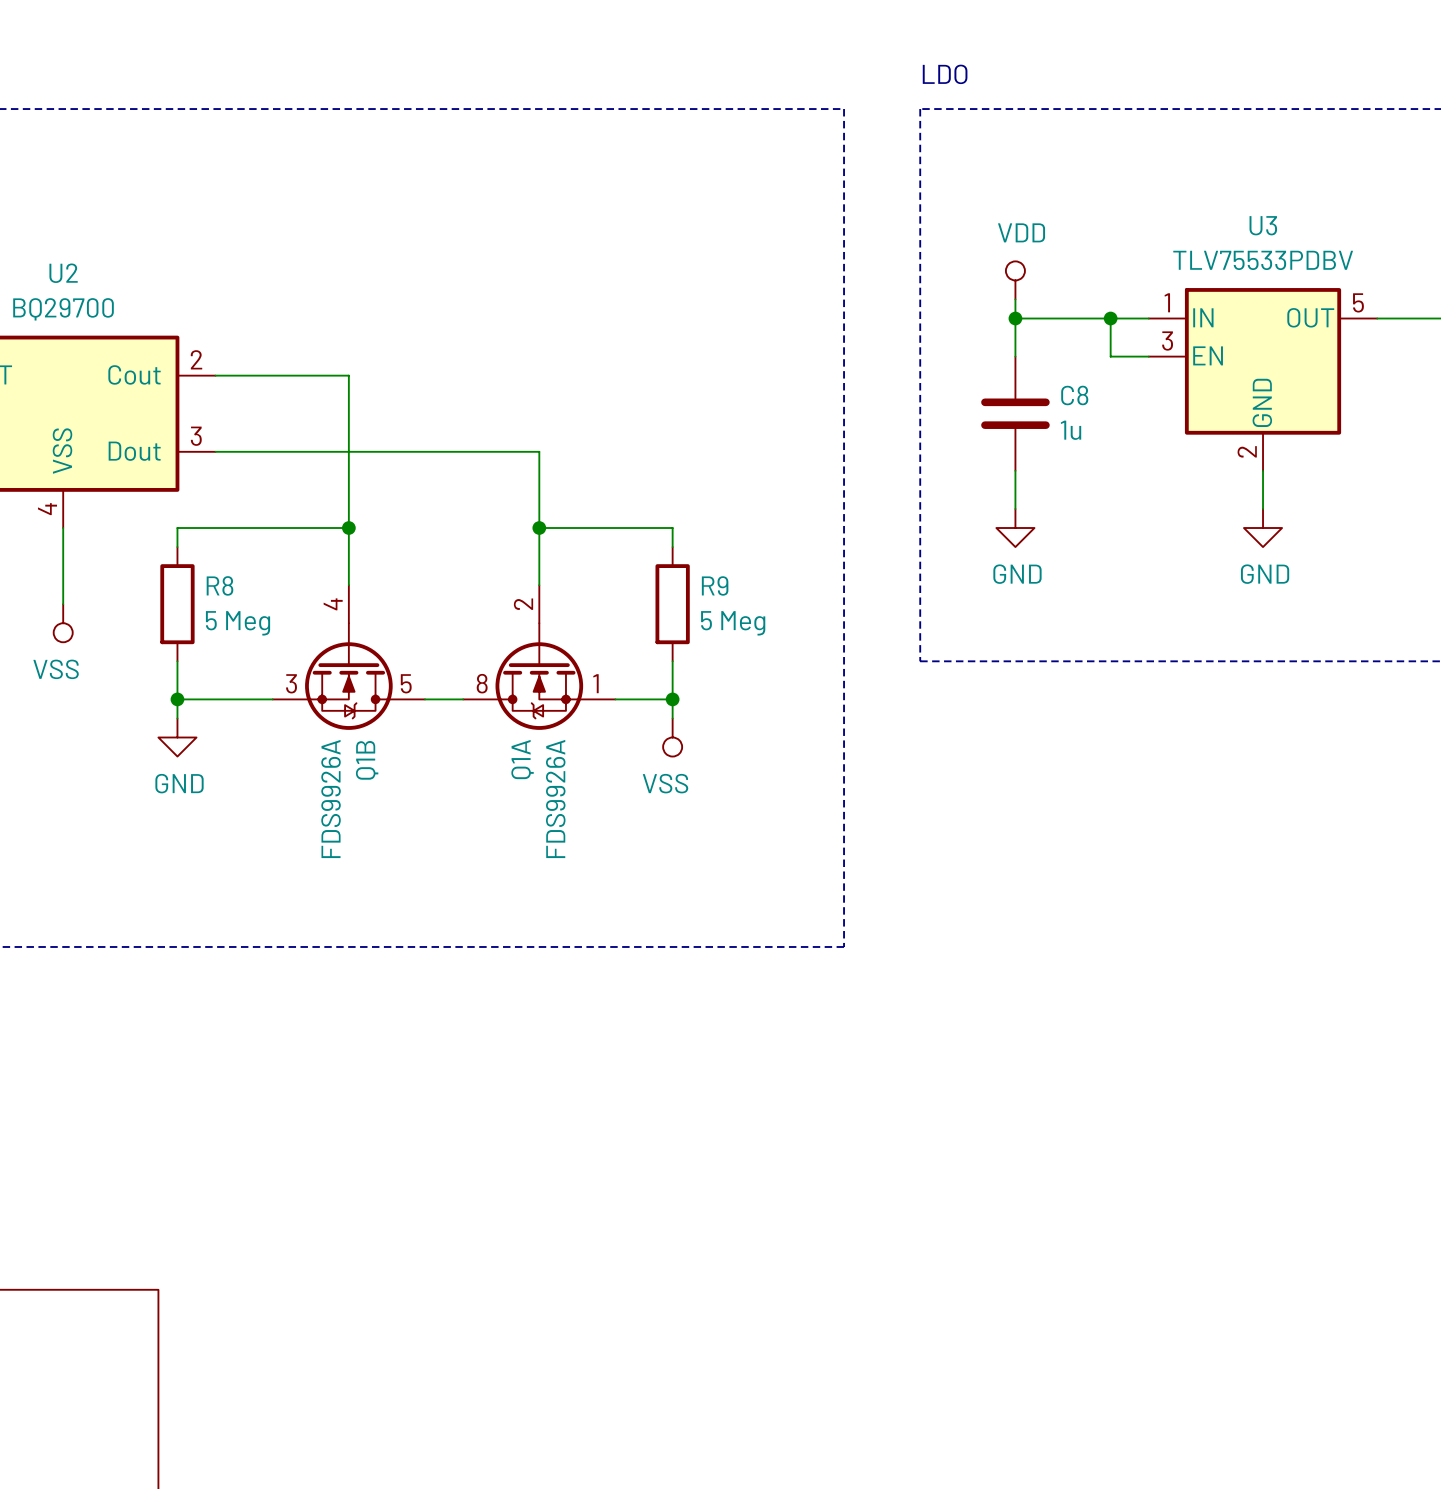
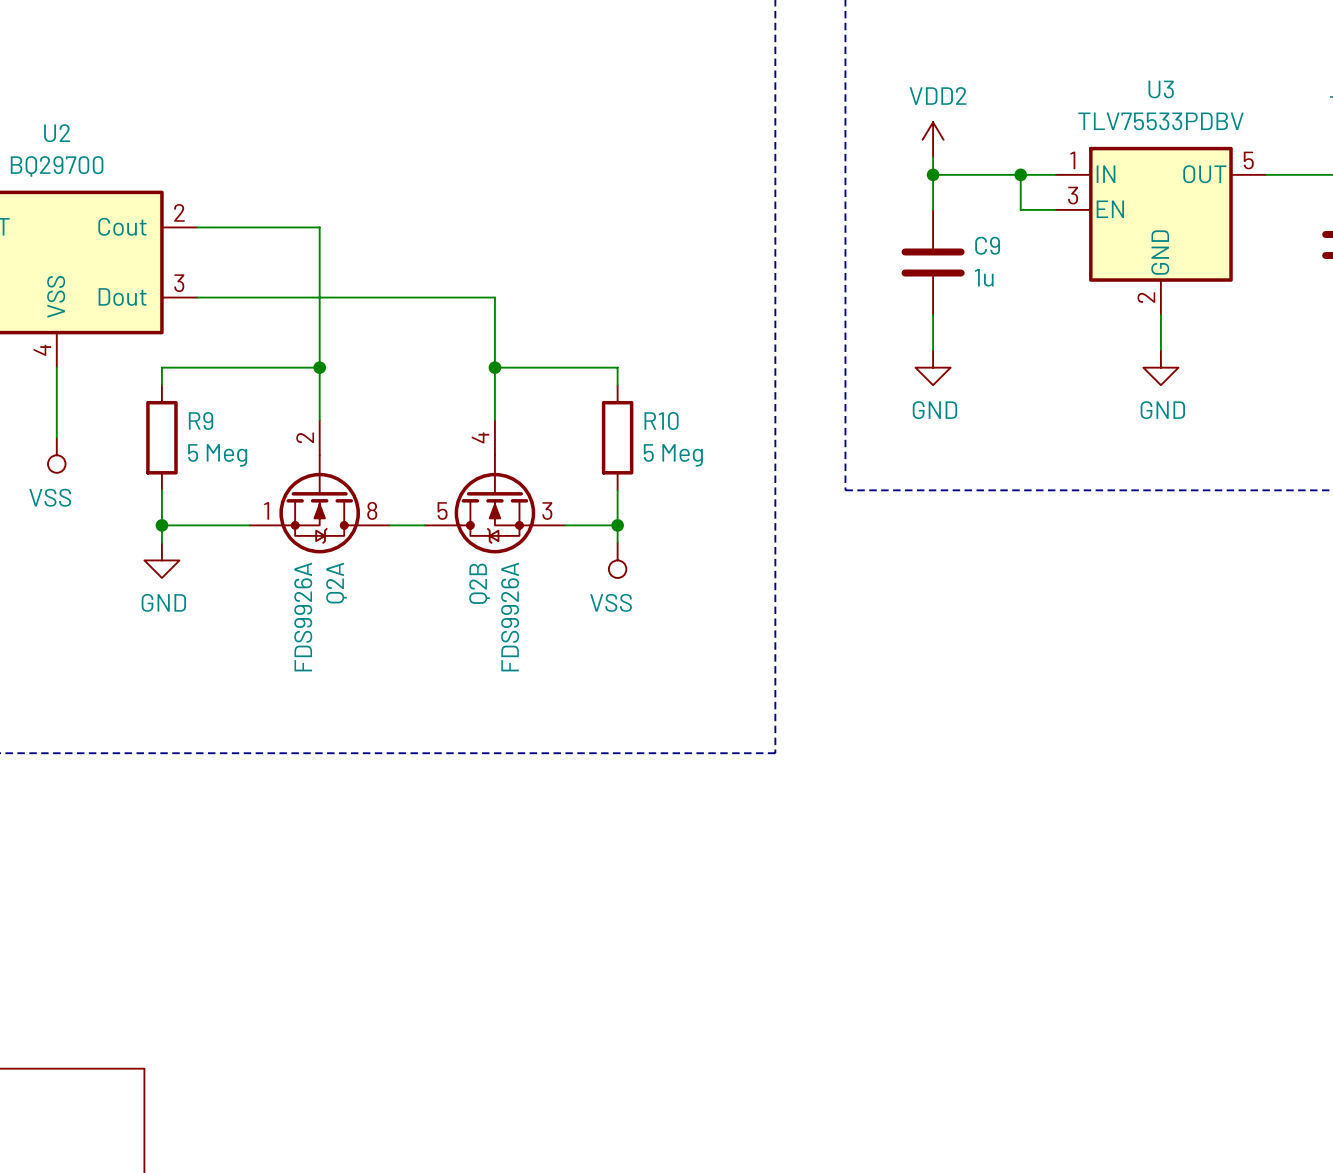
power symbol: VDD (1015, 280) -> VDD2 (933, 139)
C8 name: C8 (1074, 395) -> C9 (987, 245)
R8 name: R8 (219, 585) -> R9 (201, 420)
R9 name: R9 (715, 585) -> R10 (661, 420)
Q1B pin number: 4 (333, 604) -> 2 (305, 437)
Q1A pin number: 2 (523, 604) -> 4 (480, 437)
Q1B pin number: 3 (291, 683) -> 1 (266, 510)
Q1B pin number: 5 (406, 683) -> 8 (372, 510)
Q1A pin number: 8 (482, 683) -> 5 (442, 511)
Q1A pin number: 1 (595, 683) -> 3 (547, 511)
Q1A name: Q1A (522, 759) -> Q2B (479, 583)
Q1B name: Q1B (367, 760) -> Q2A (336, 583)

